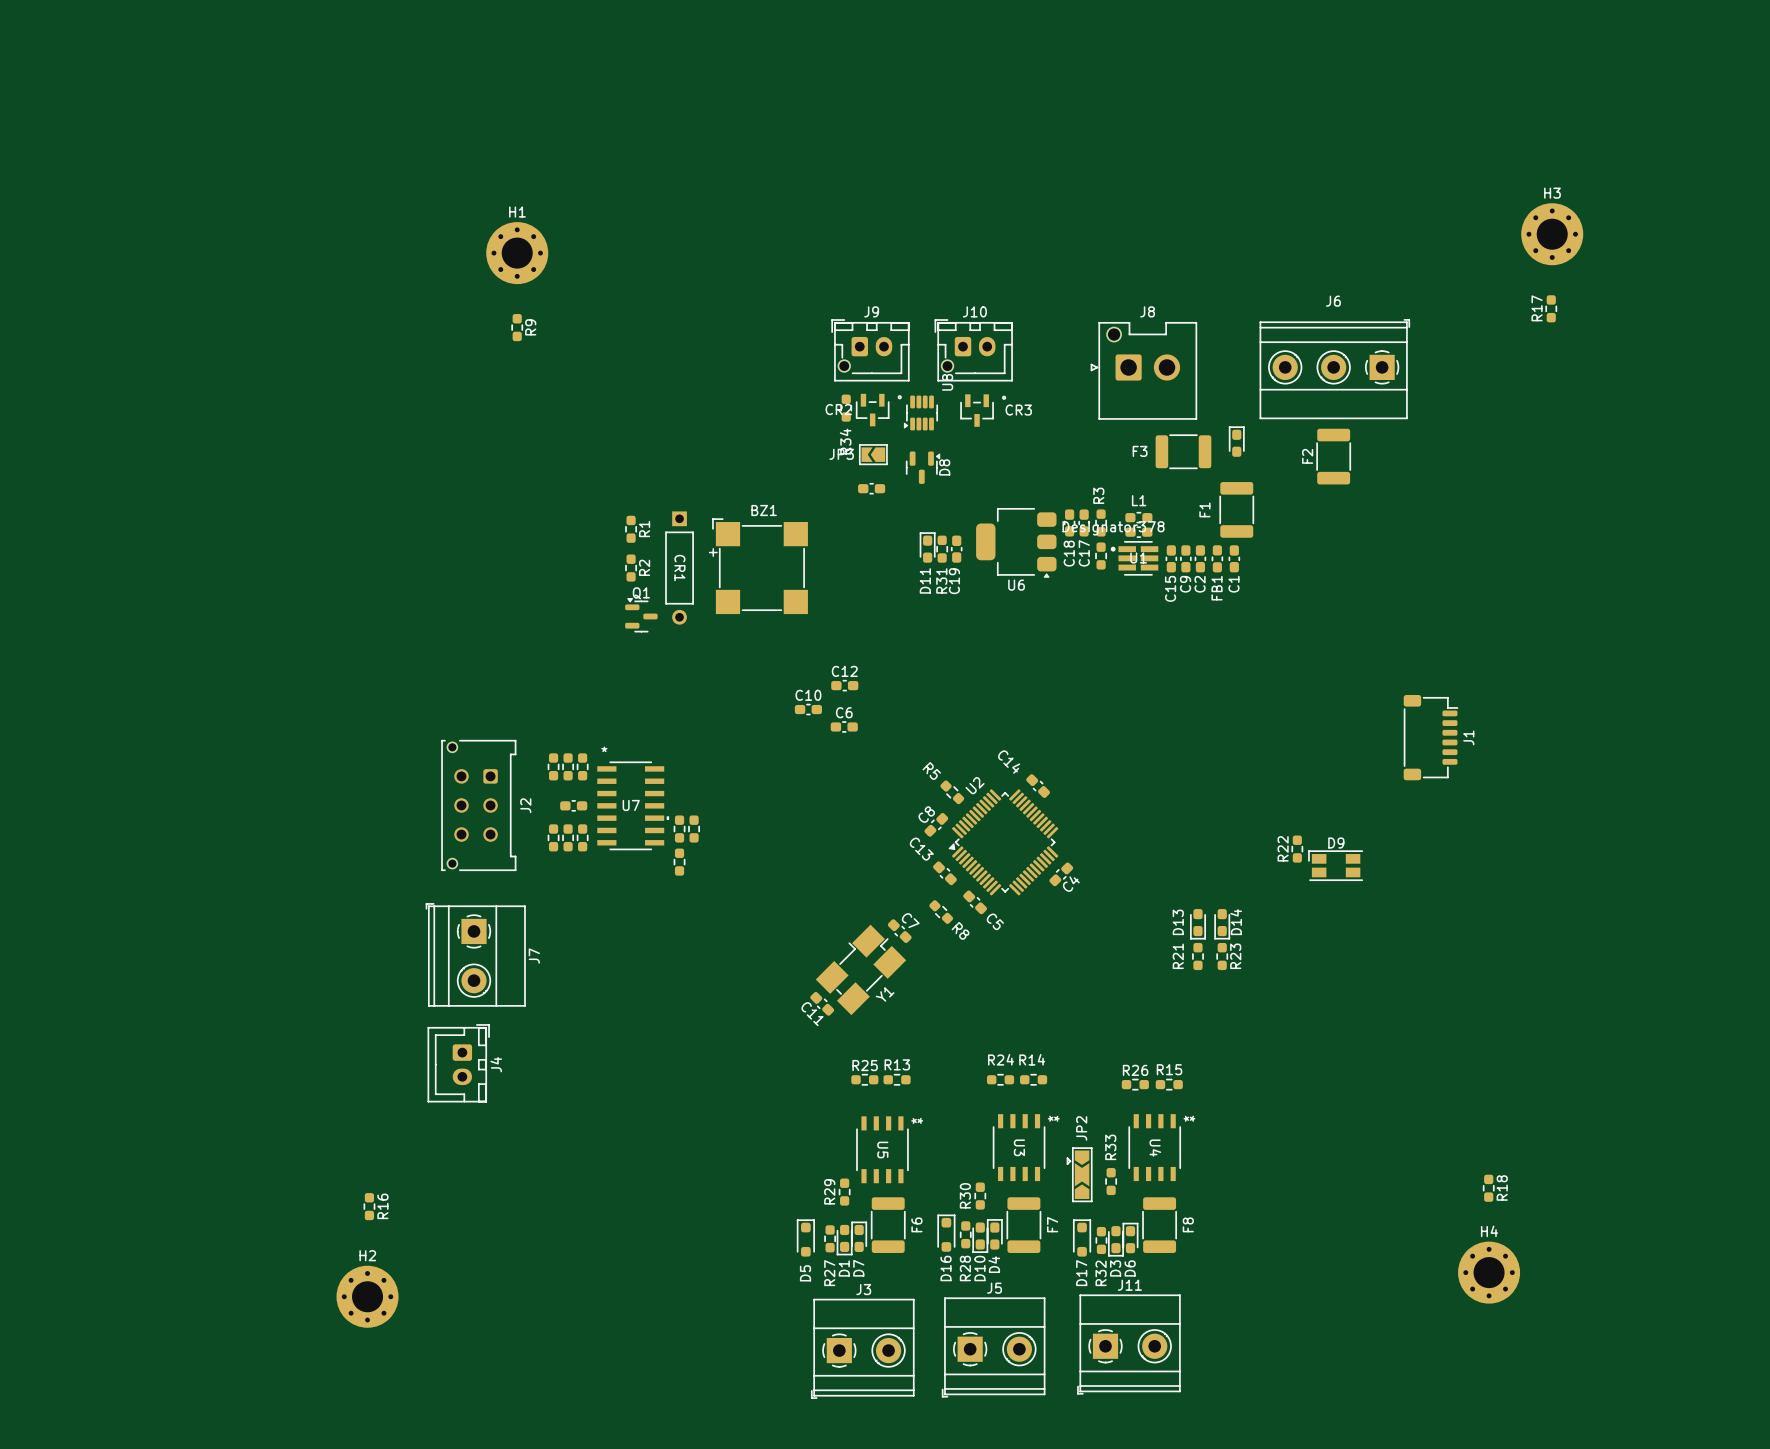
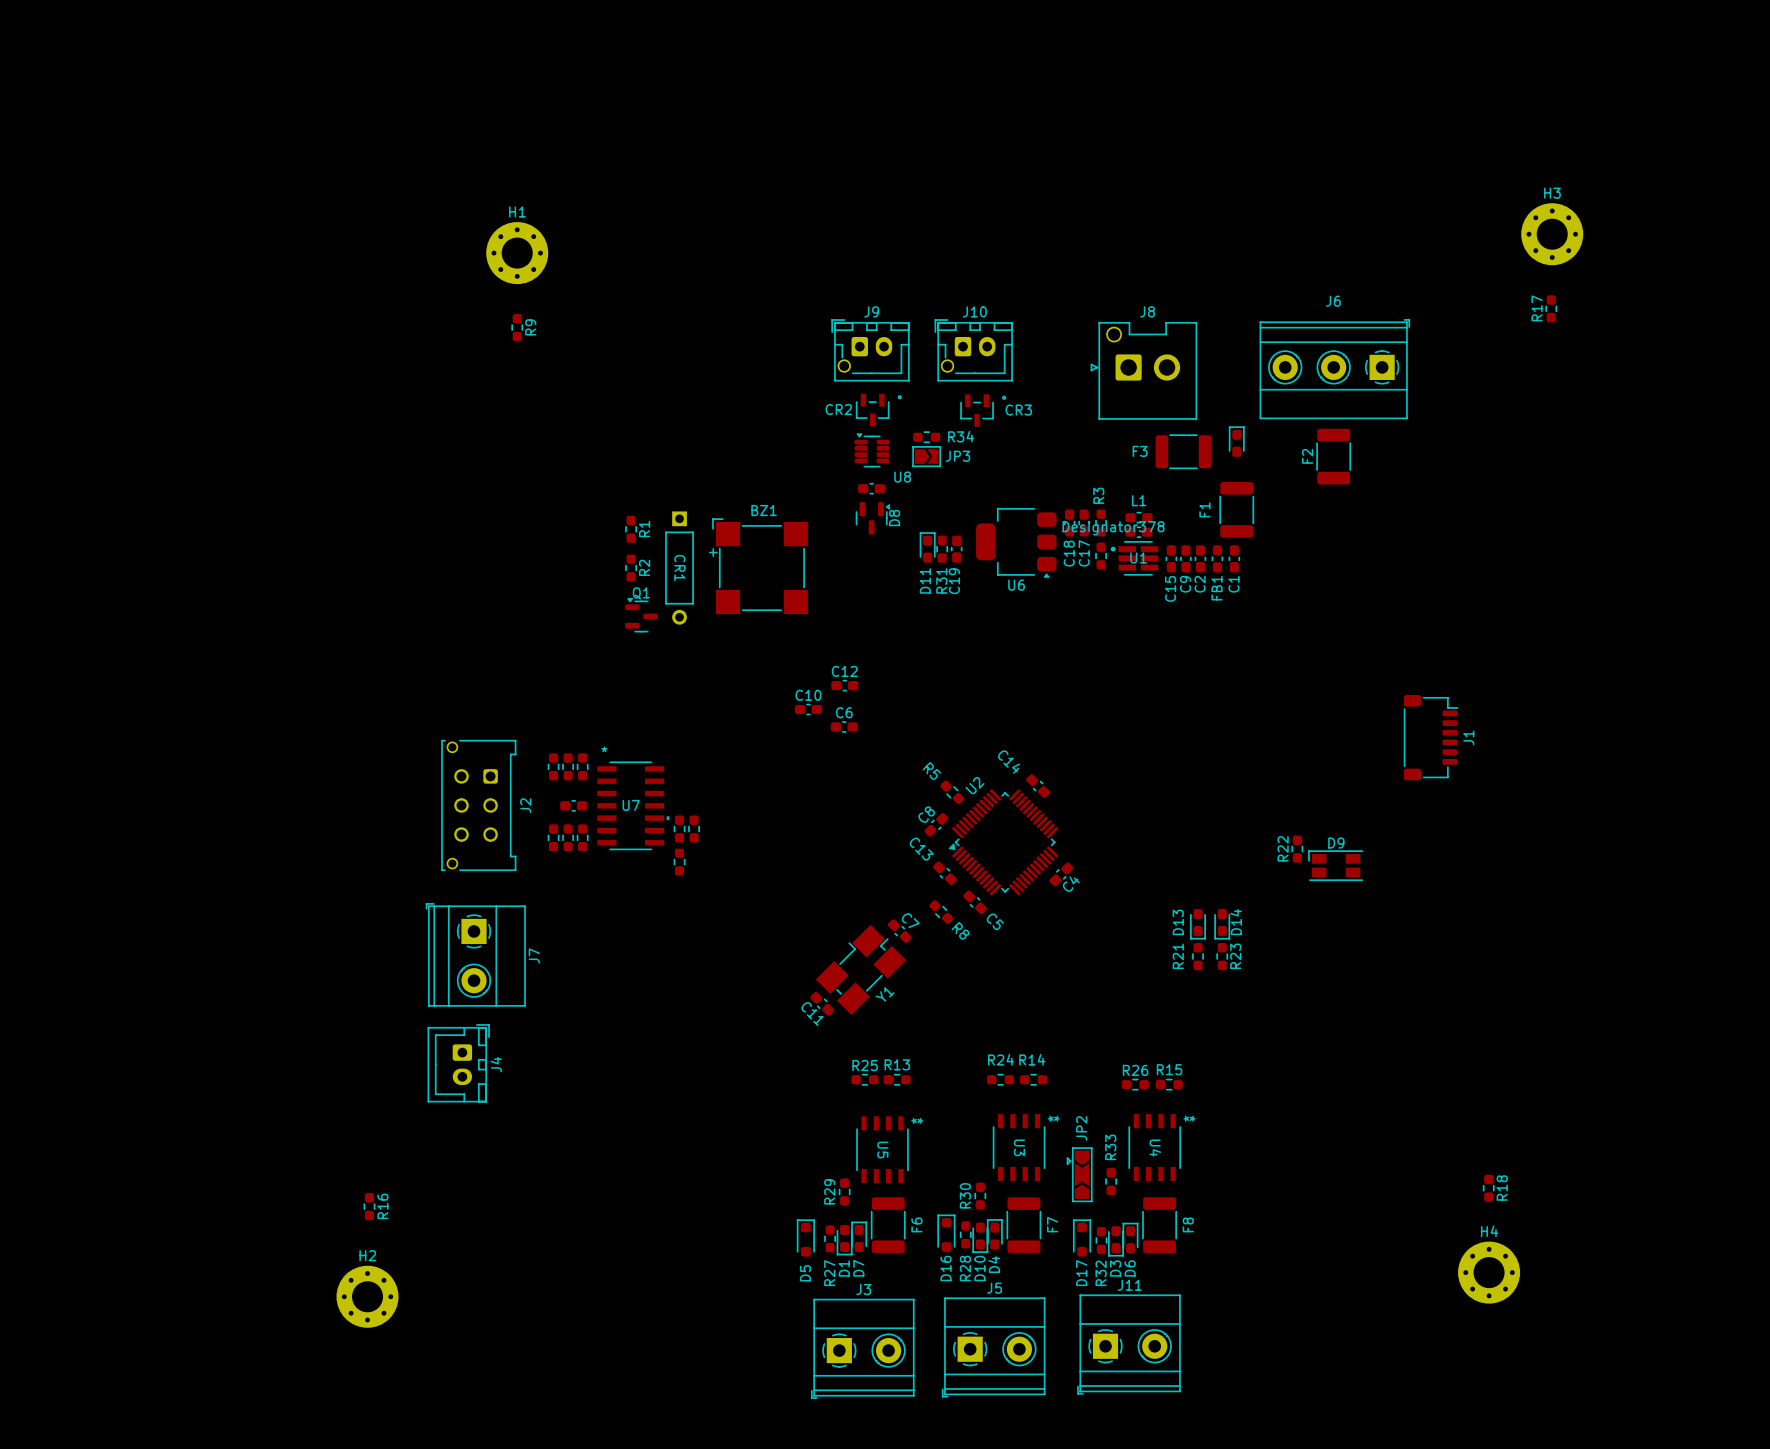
R34 rotation: 0° (846, 408) -> 90° clockwise (926, 437)
R34 position: (846, 408) -> (926, 437)
U8 rotation: 0° (920, 412) -> 90° clockwise (872, 450)
U8 position: (920, 412) -> (872, 450)
R34 name position: R34 (845, 441) -> R34 (961, 436)
JP3 rotation: 0° (873, 454) -> 180° (926, 456)
JP3 position: (873, 454) -> (926, 456)
D8 position: (923, 467) -> (873, 518)

